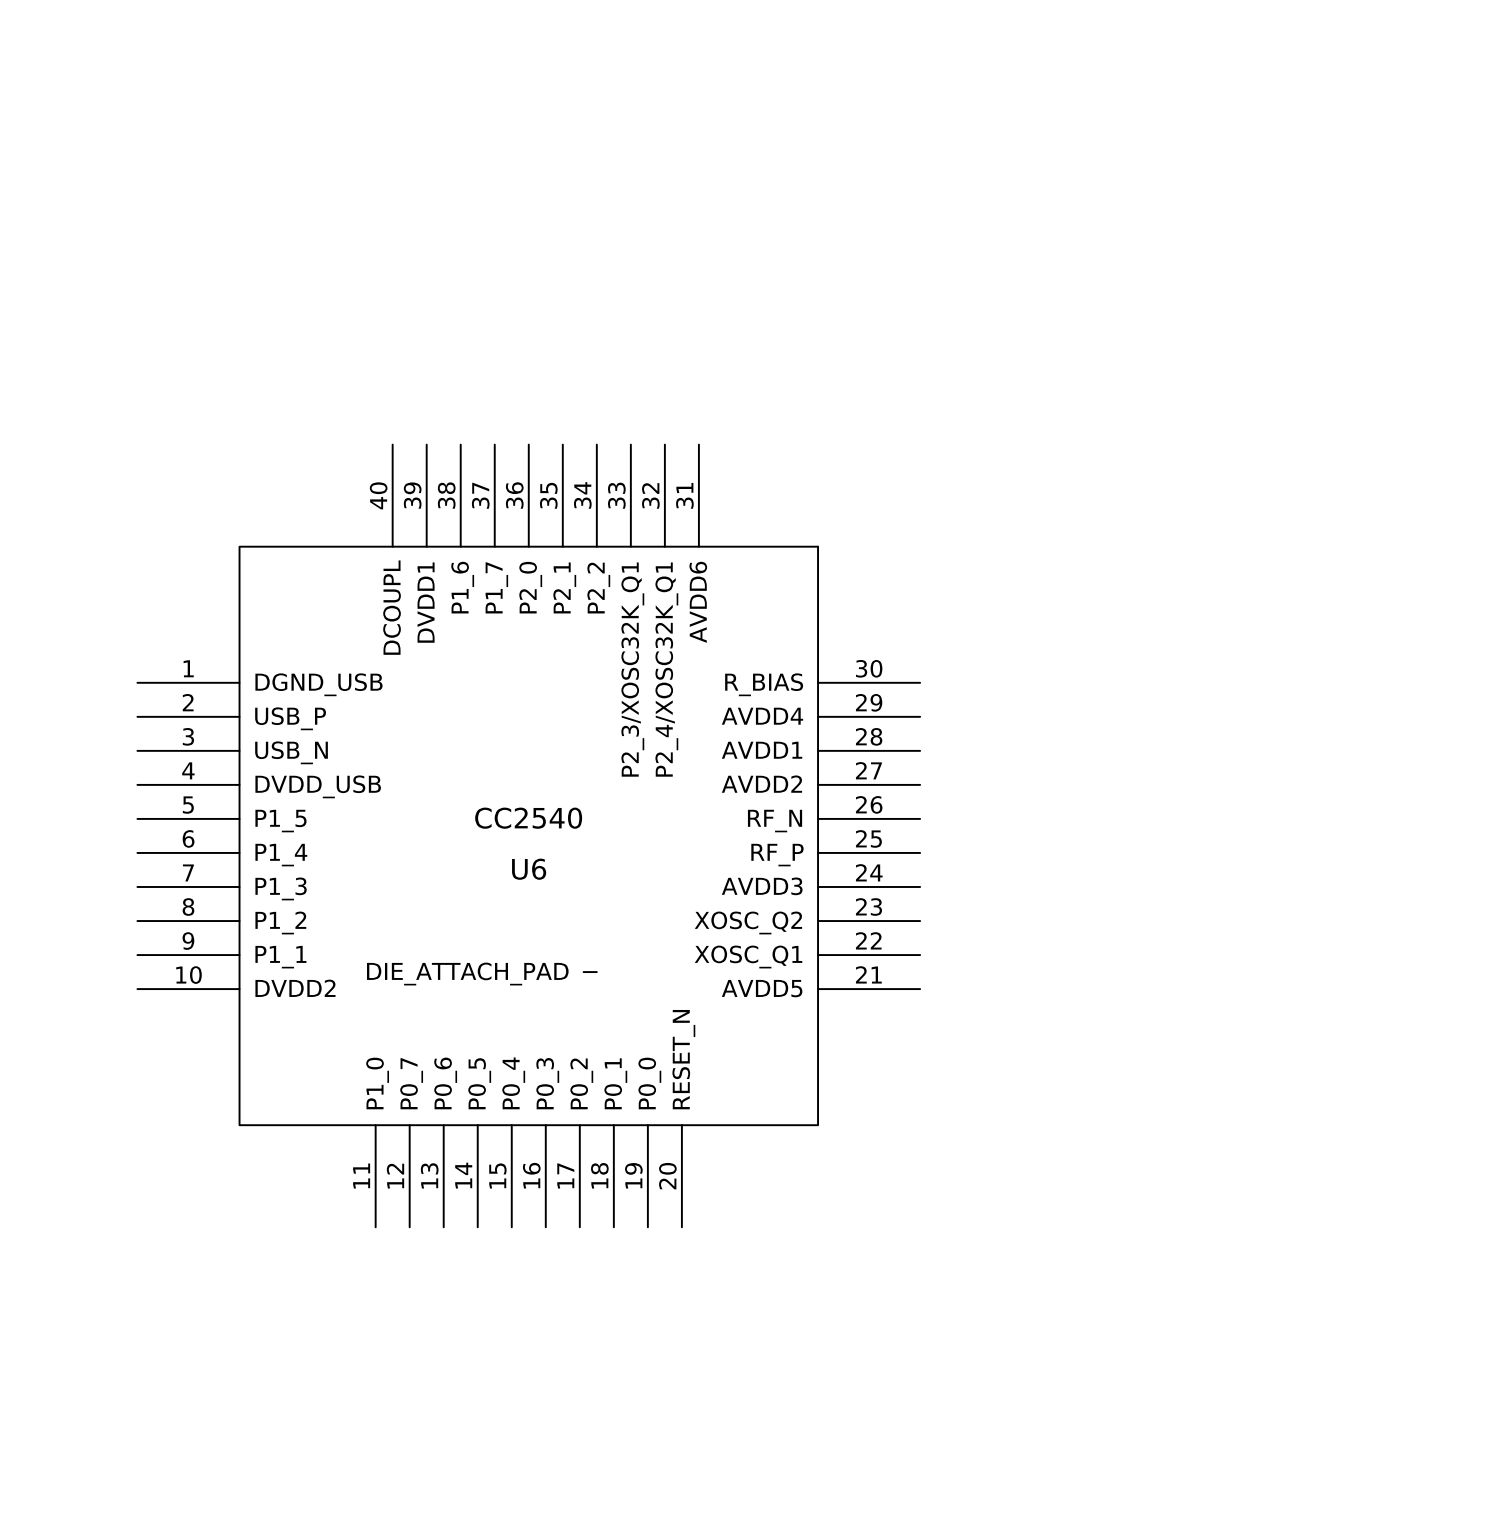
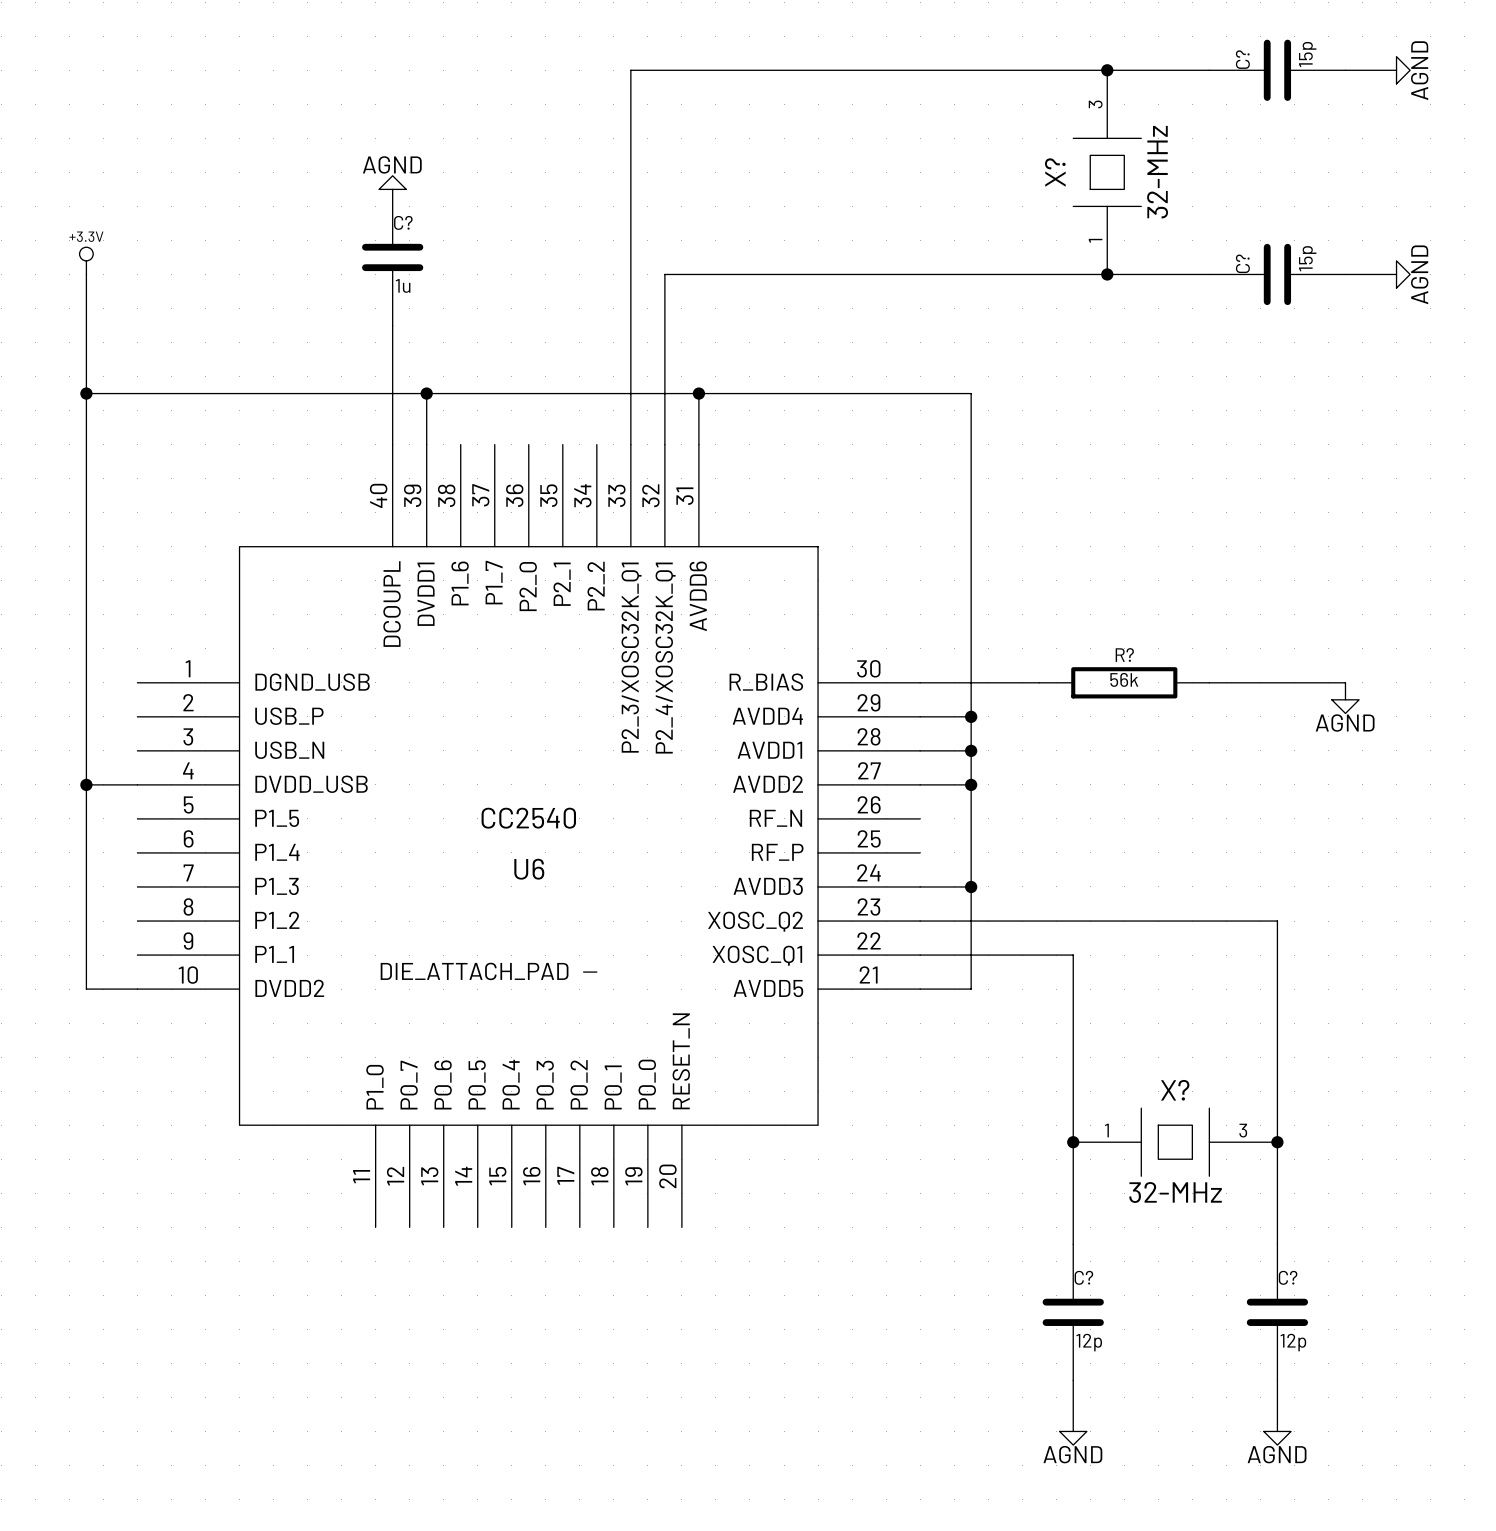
junction: none -> (1107, 70)
wire: none -> (1209, 70) (630, 70) (630, 444)
C?: none -> 15p (1277, 70)
wire: none -> (1345, 70) (1396, 70)
power symbol: none -> AGND (1403, 70)
X?: none -> 32-MHz (1107, 172)
power symbol: none -> AGND (392, 182)
C?: none -> 1u (392, 257)
power symbol: none -> +3.3V (86, 260)
wire: none -> (86, 274) (86, 989) (137, 989)
junction: none -> (1107, 274)
wire: none -> (1209, 274) (664, 274) (664, 444)
C?: none -> 15p (1277, 274)
wire: none -> (1345, 274) (1396, 274)
power symbol: none -> AGND (1403, 274)
wire: none -> (392, 325) (392, 444)
wire: none -> (86, 393) (971, 393) (971, 989) (920, 989)
junction: none -> (86, 393)
wire: none -> (426, 393) (426, 444)
junction: none -> (426, 393)
wire: none -> (698, 393) (698, 444)
junction: none -> (698, 393)
wire: none -> (920, 682) (1039, 682)
R?: none -> 56k (1124, 682)
wire: none -> (1209, 682) (1345, 682) (1345, 699)
power symbol: none -> AGND (1345, 706)
wire: none -> (920, 716) (971, 716)
junction: none -> (971, 716)
wire: none -> (920, 750) (971, 750)
junction: none -> (971, 750)
wire: none -> (86, 784) (137, 784)
junction: none -> (86, 784)
wire: none -> (920, 784) (971, 784)
junction: none -> (971, 784)
wire: none -> (920, 886) (971, 886)
junction: none -> (971, 886)
wire: none -> (920, 921) (1277, 921) (1277, 1244)
wire: none -> (920, 955) (1073, 955) (1073, 1244)
junction: none -> (1073, 1142)
X?: none -> 32-MHz (1175, 1142)
junction: none -> (1277, 1142)
C?: none -> 12p (1073, 1312)
C?: none -> 12p (1277, 1312)
wire: none -> (1073, 1380) (1073, 1431)
wire: none -> (1277, 1380) (1277, 1431)
power symbol: none -> AGND (1073, 1438)
power symbol: none -> AGND (1277, 1438)

